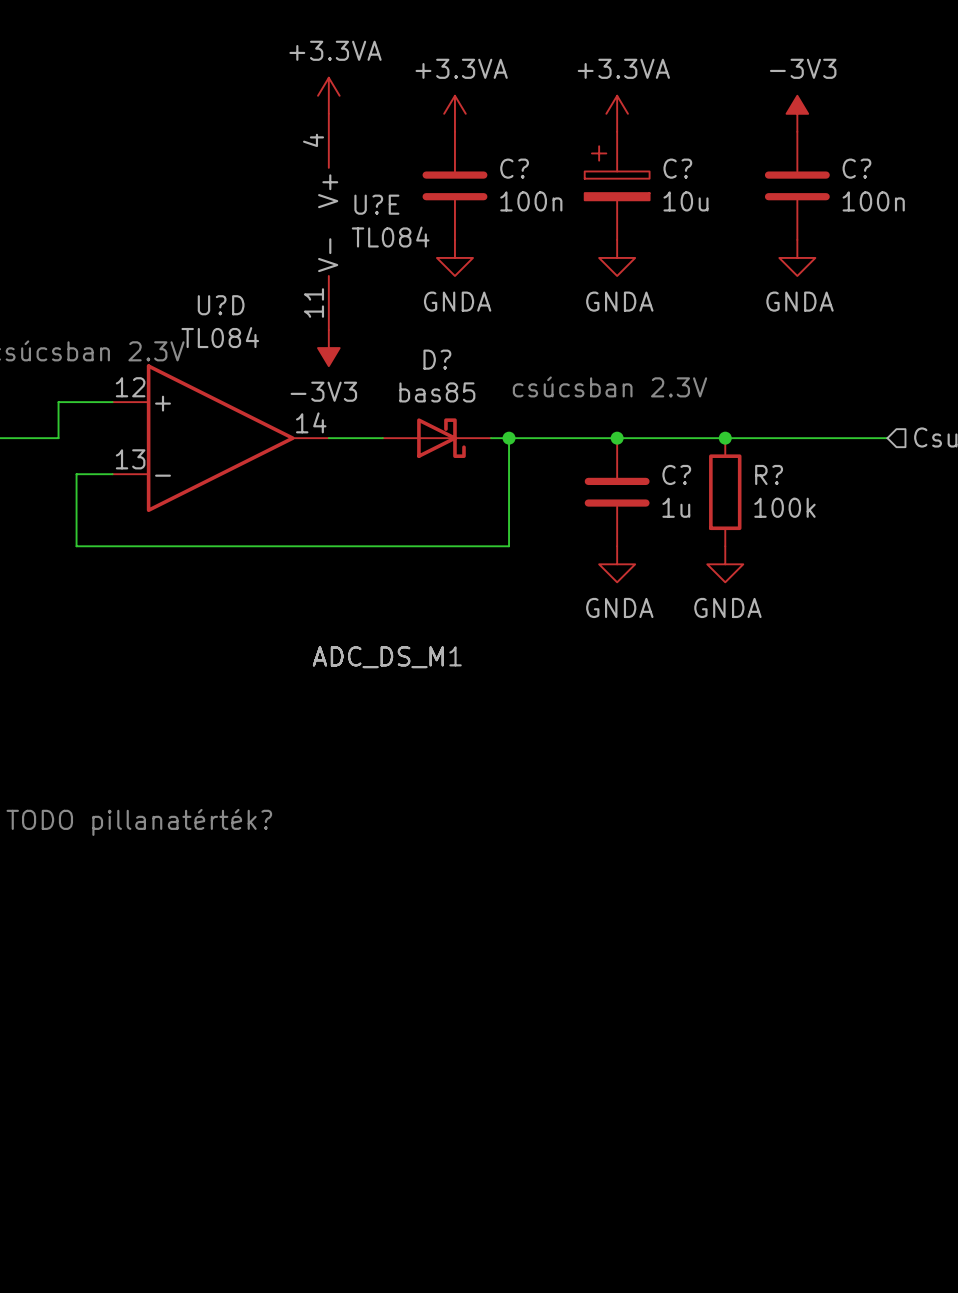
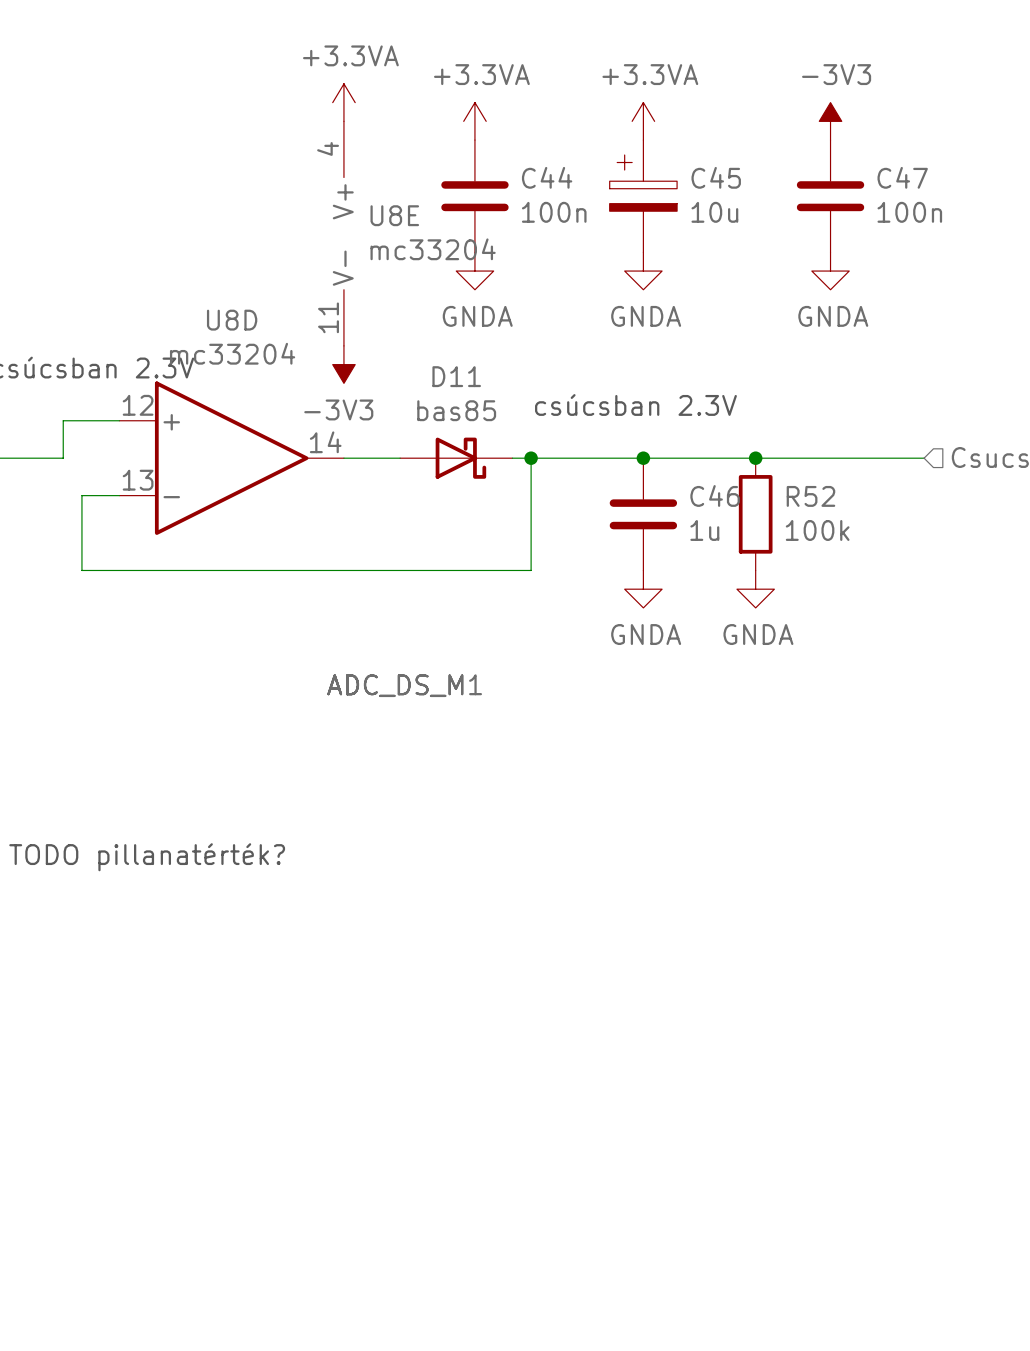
C? name: C? (514, 168) -> C44 (547, 177)
C? name: C? (677, 168) -> C45 (716, 177)
C? name: C? (856, 168) -> C47 (902, 177)
U?E name: U?E (376, 204) -> U8E (394, 215)
U?E value: TL084 (390, 237) -> mc33204 (433, 249)
U?D name: U?D (221, 305) -> U8D (232, 320)
U?D value: TL084 (220, 337) -> mc33204 (232, 353)
D? name: D? (437, 359) -> D11 (456, 376)
C? name: C? (676, 474) -> C46 (715, 495)
R? name: R? (769, 474) -> R52 (810, 496)

